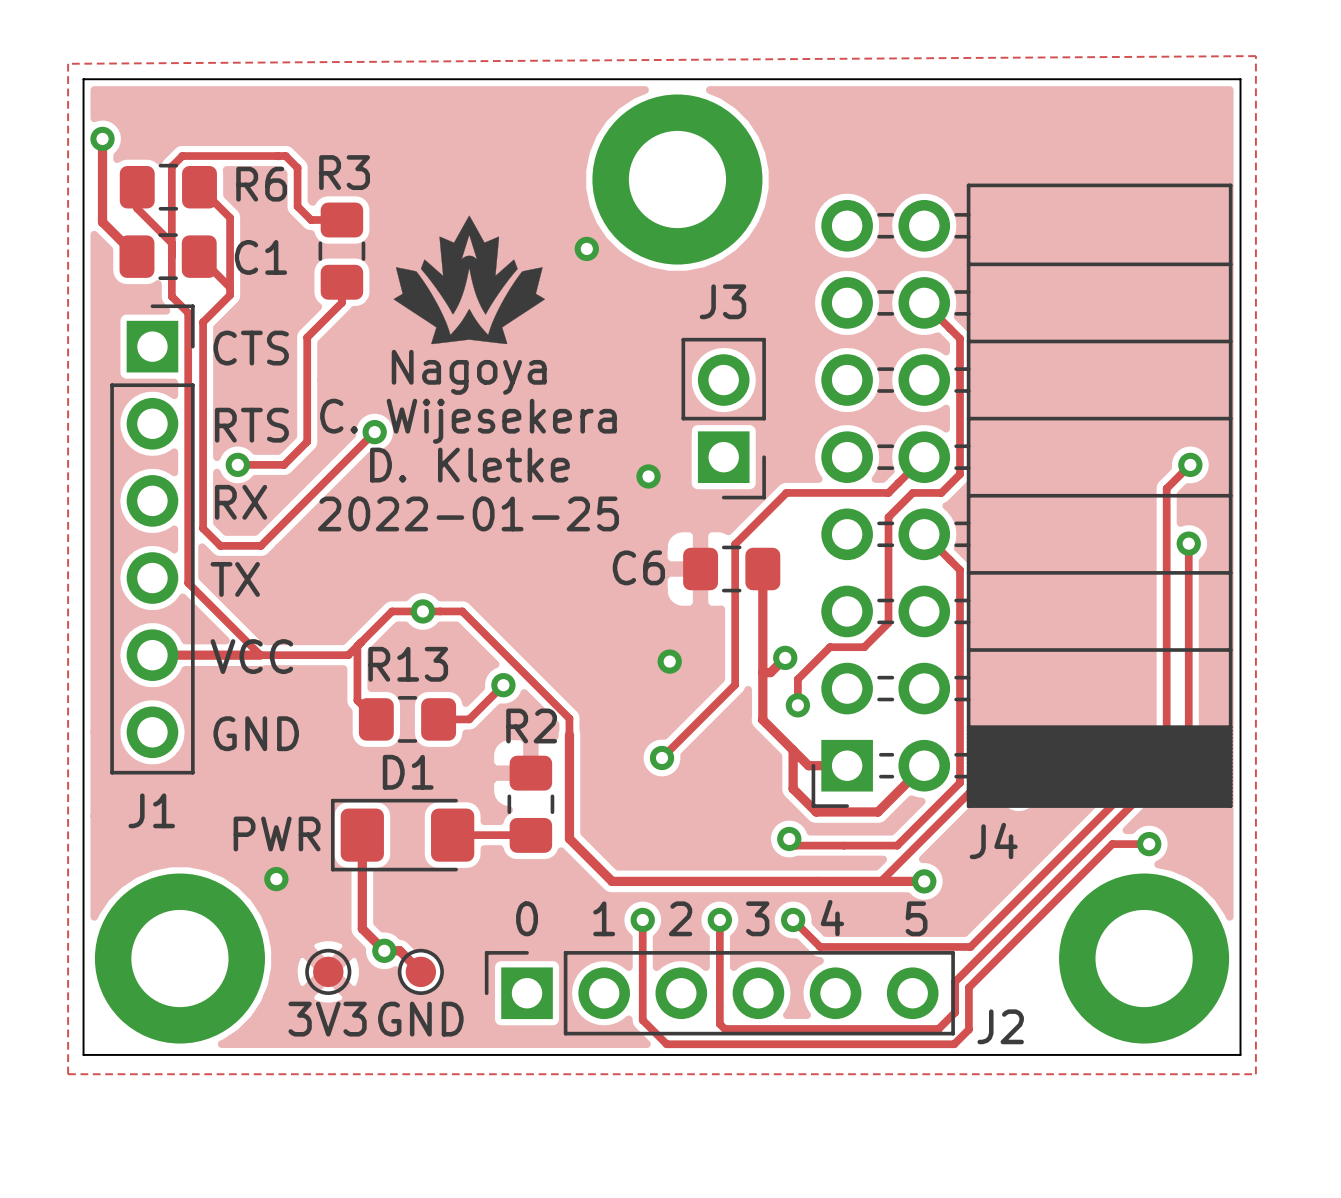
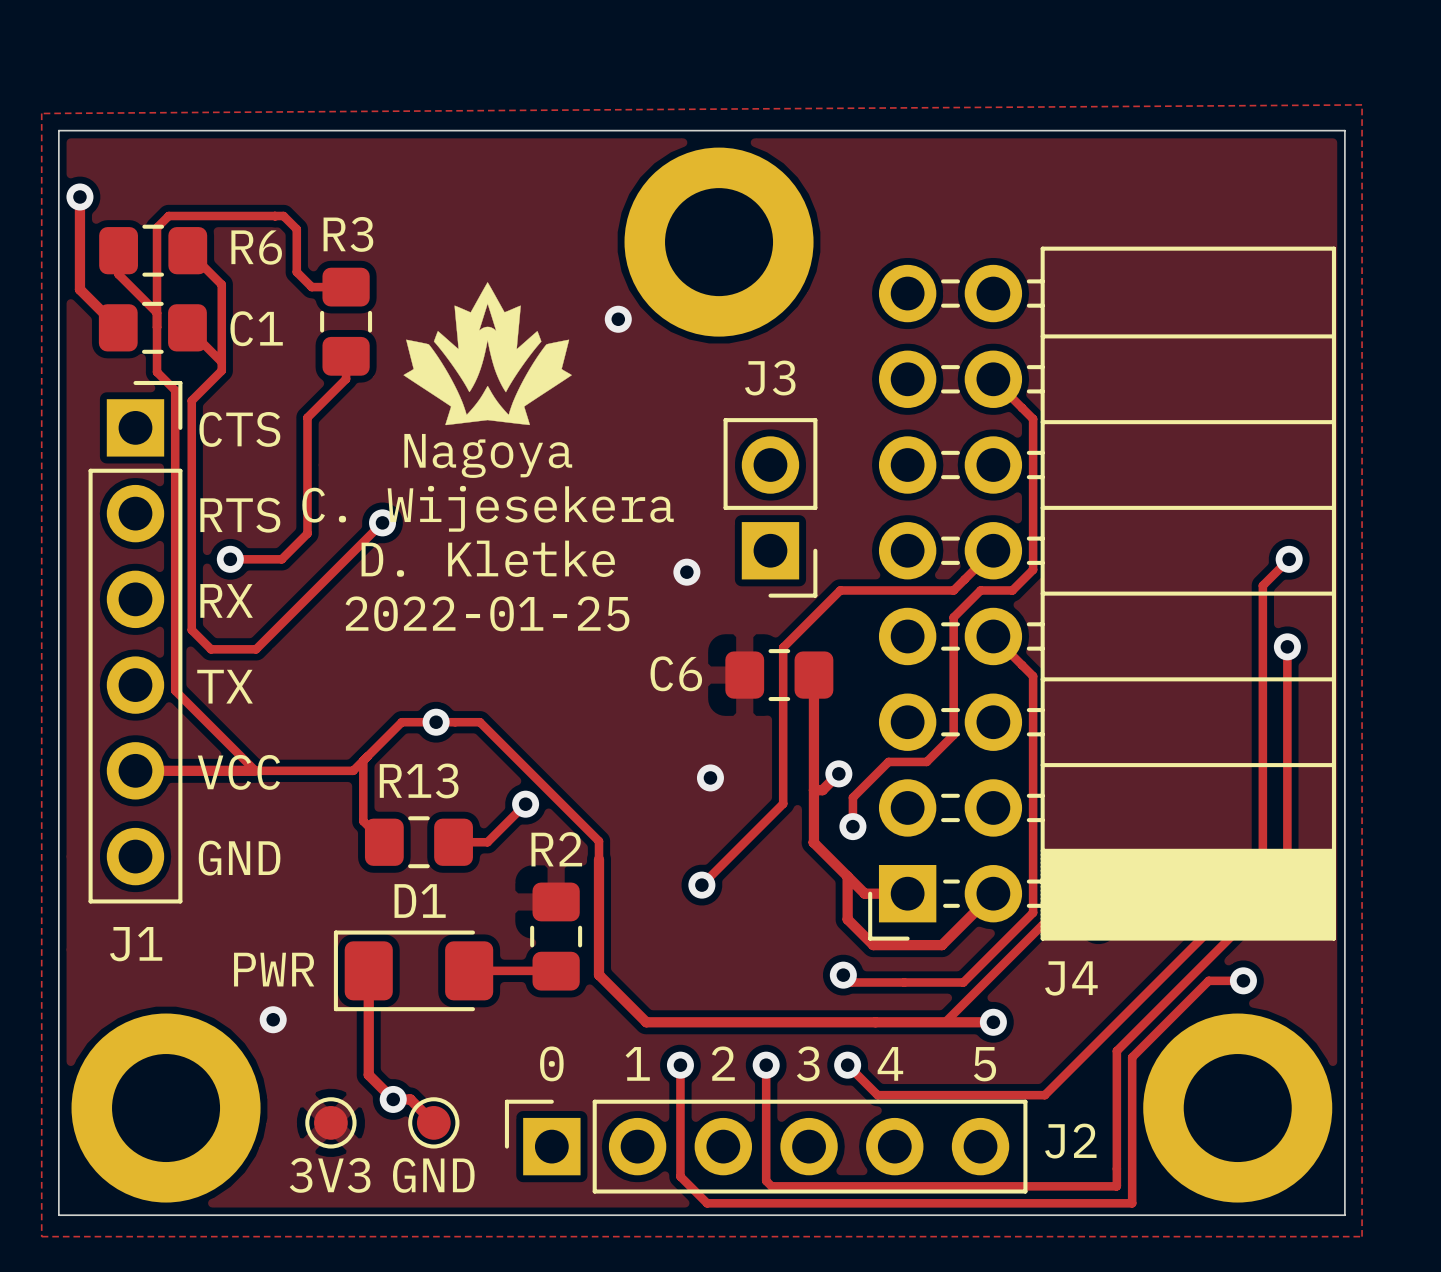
track: (1188, 748) (955, 981) (955, 1012) (938, 1028) -> (1287, 874) (1287, 880) (1116, 1051) (1116, 1186)
track: (1117, 844) (1112, 844) (968, 987) (968, 1029) (954, 1044) -> (1208, 980) (1132, 1057) (1132, 1203) (1026, 1203)
J2 name position: J2 (1000, 1026) -> J2 (1070, 1141)
track: none -> (1009, 1186) (1116, 1186)

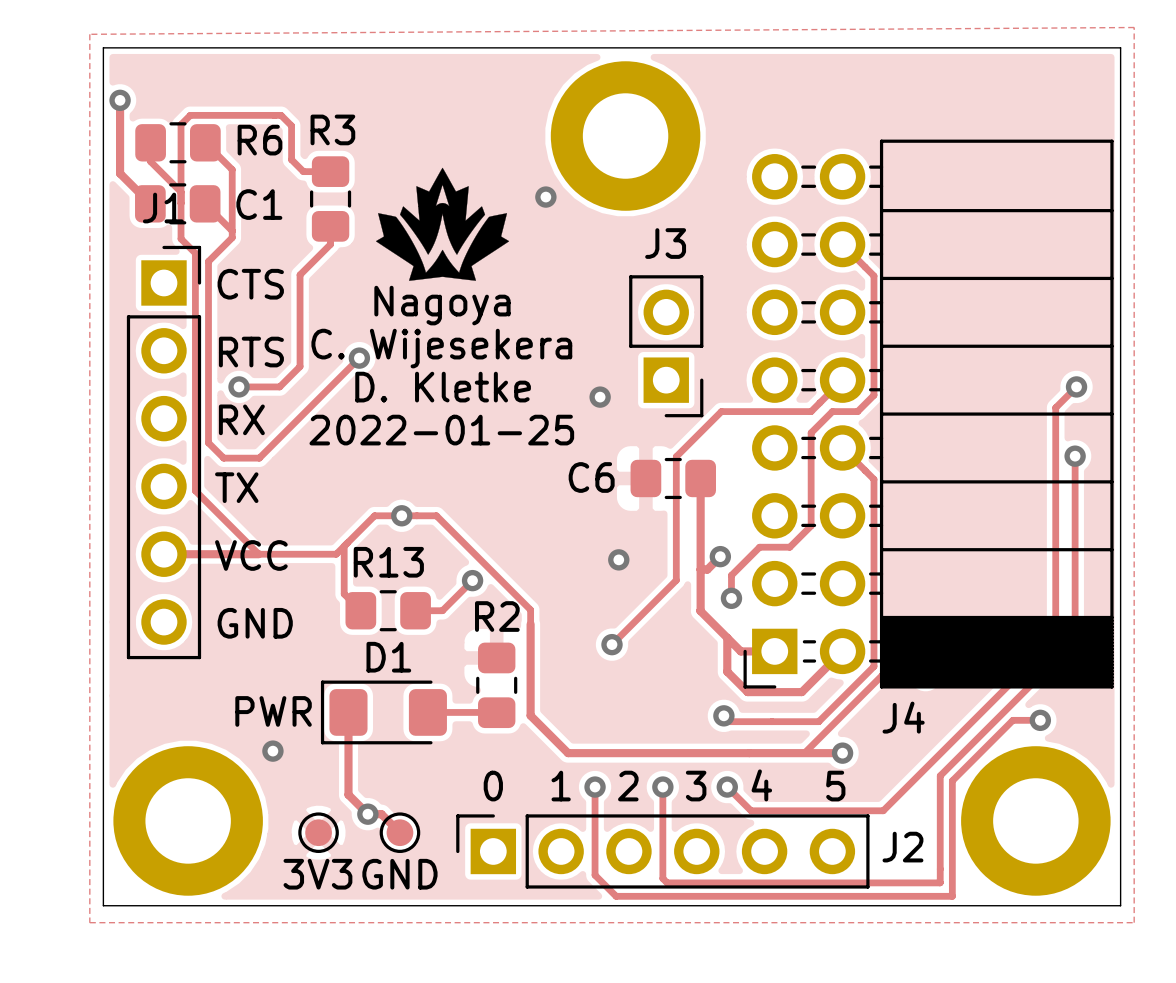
J1 name position: J1 (136, 944) -> J1 (163, 208)

